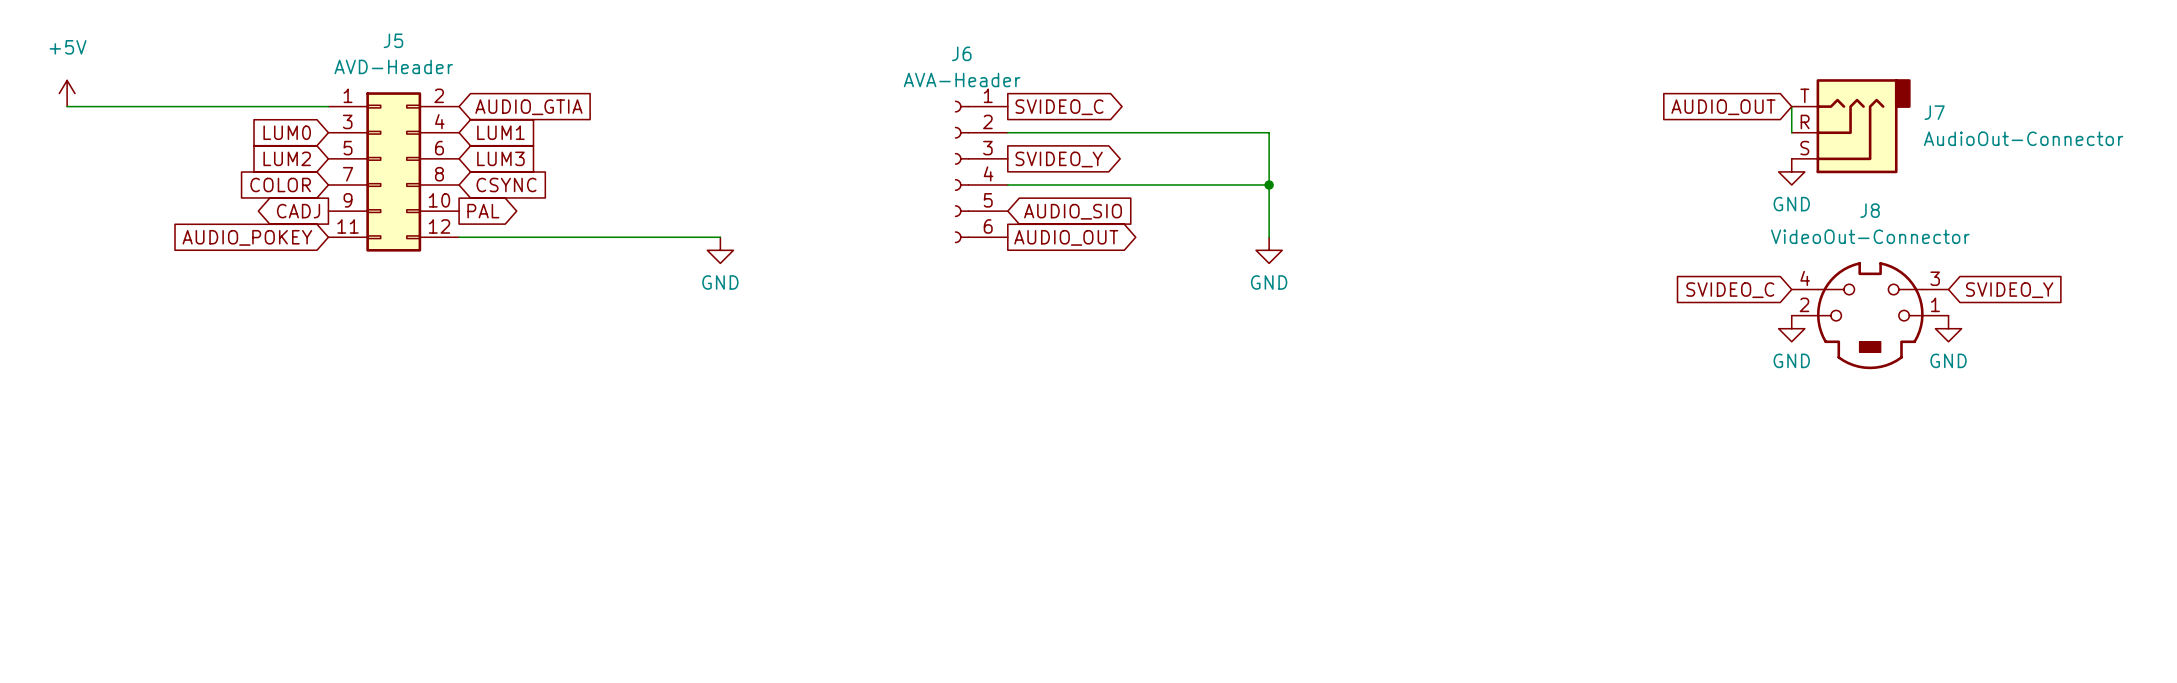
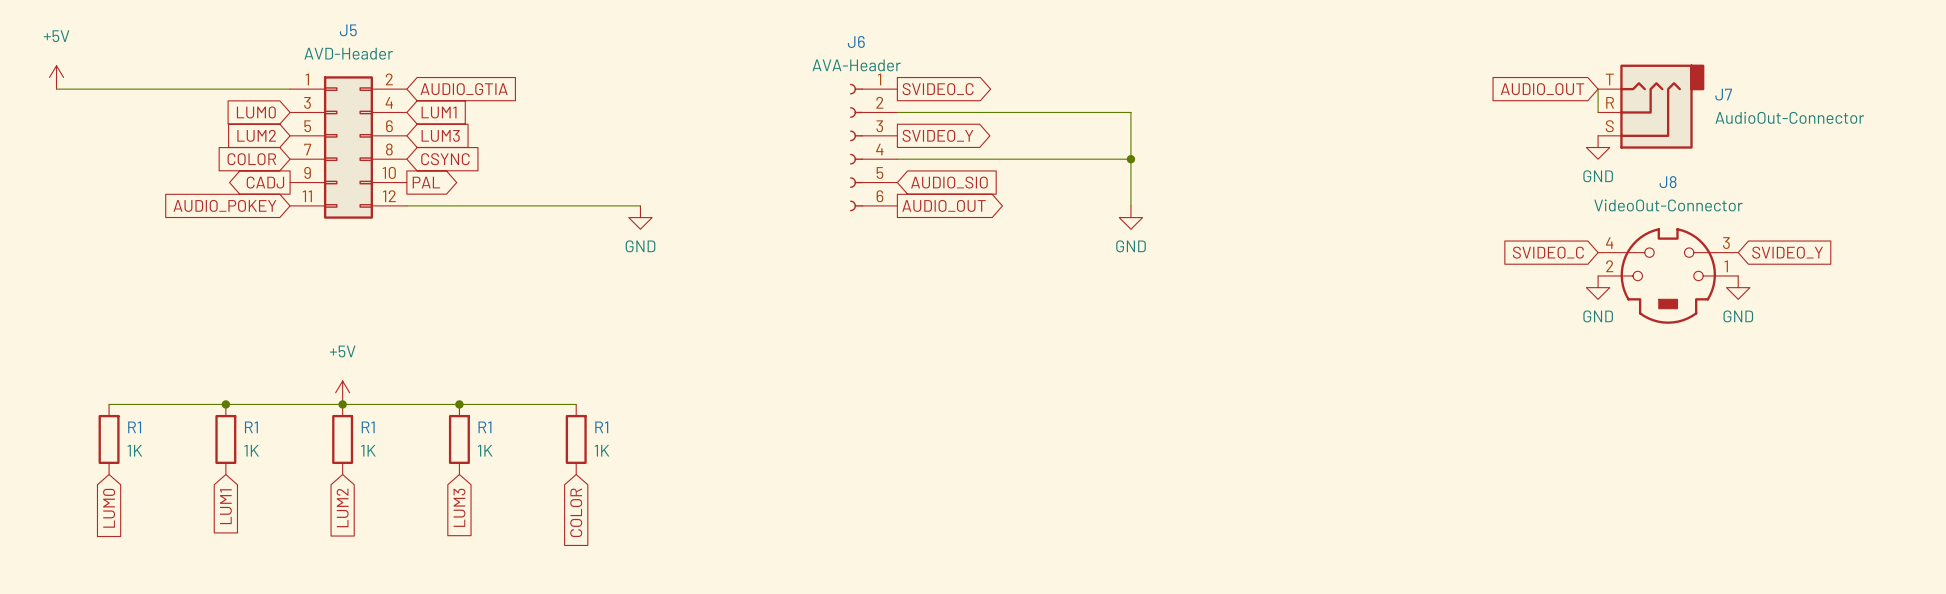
power symbol: none -> +5V (342, 392)
wire: none -> (109, 404) (576, 404)
junction: none -> (225, 404)
junction: none -> (342, 404)
junction: none -> (459, 404)
R1: none -> 1K (109, 439)
R1: none -> 1K (225, 439)
R1: none -> 1K (342, 439)
R1: none -> 1K (459, 439)
R1: none -> 1K (576, 439)
global label: none -> LUM0 (109, 508)
global label: none -> LUM1 (225, 506)
global label: none -> LUM2 (342, 507)
global label: none -> LUM3 (459, 507)
global label: none -> COLOR (576, 512)

